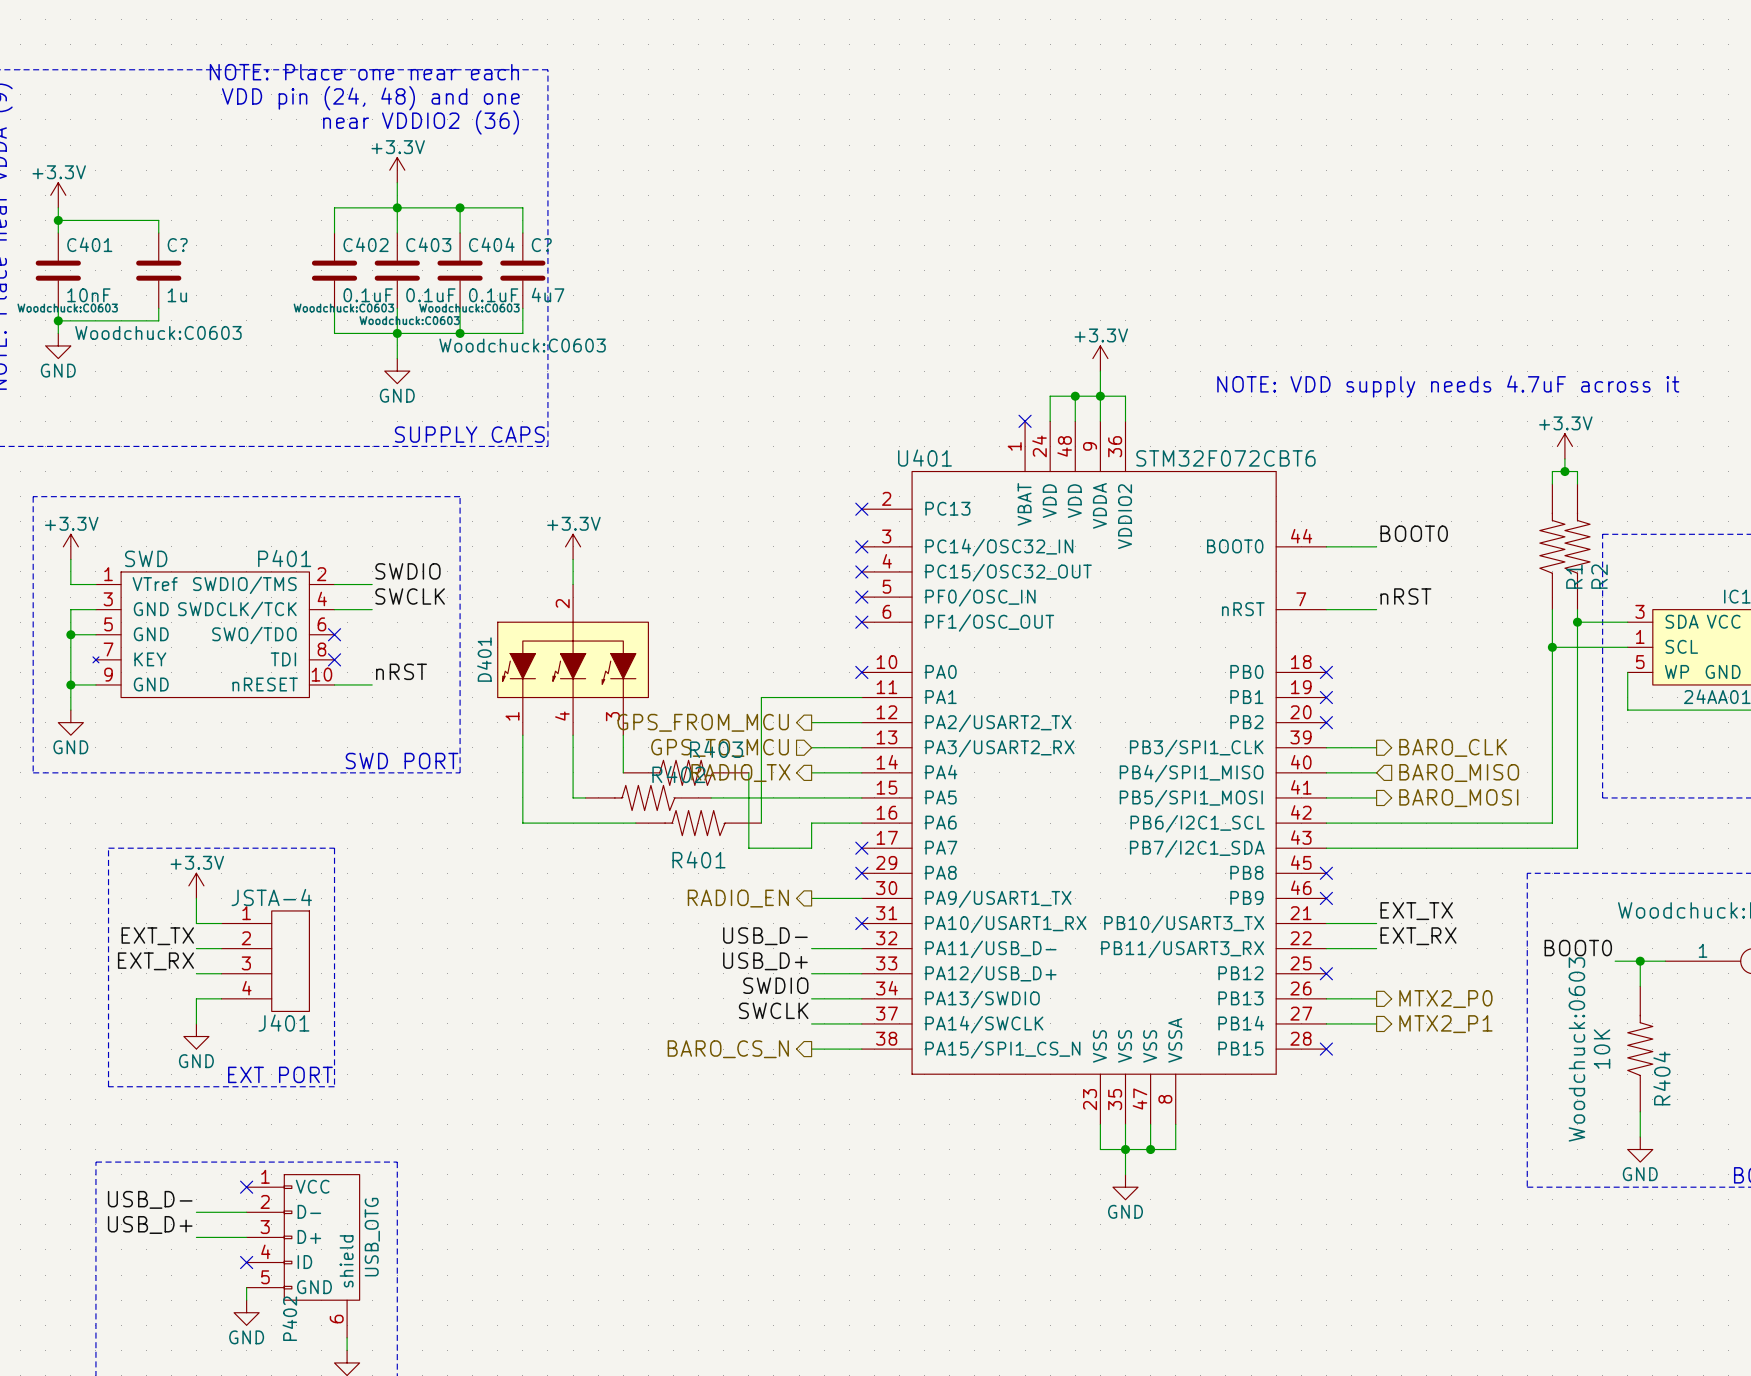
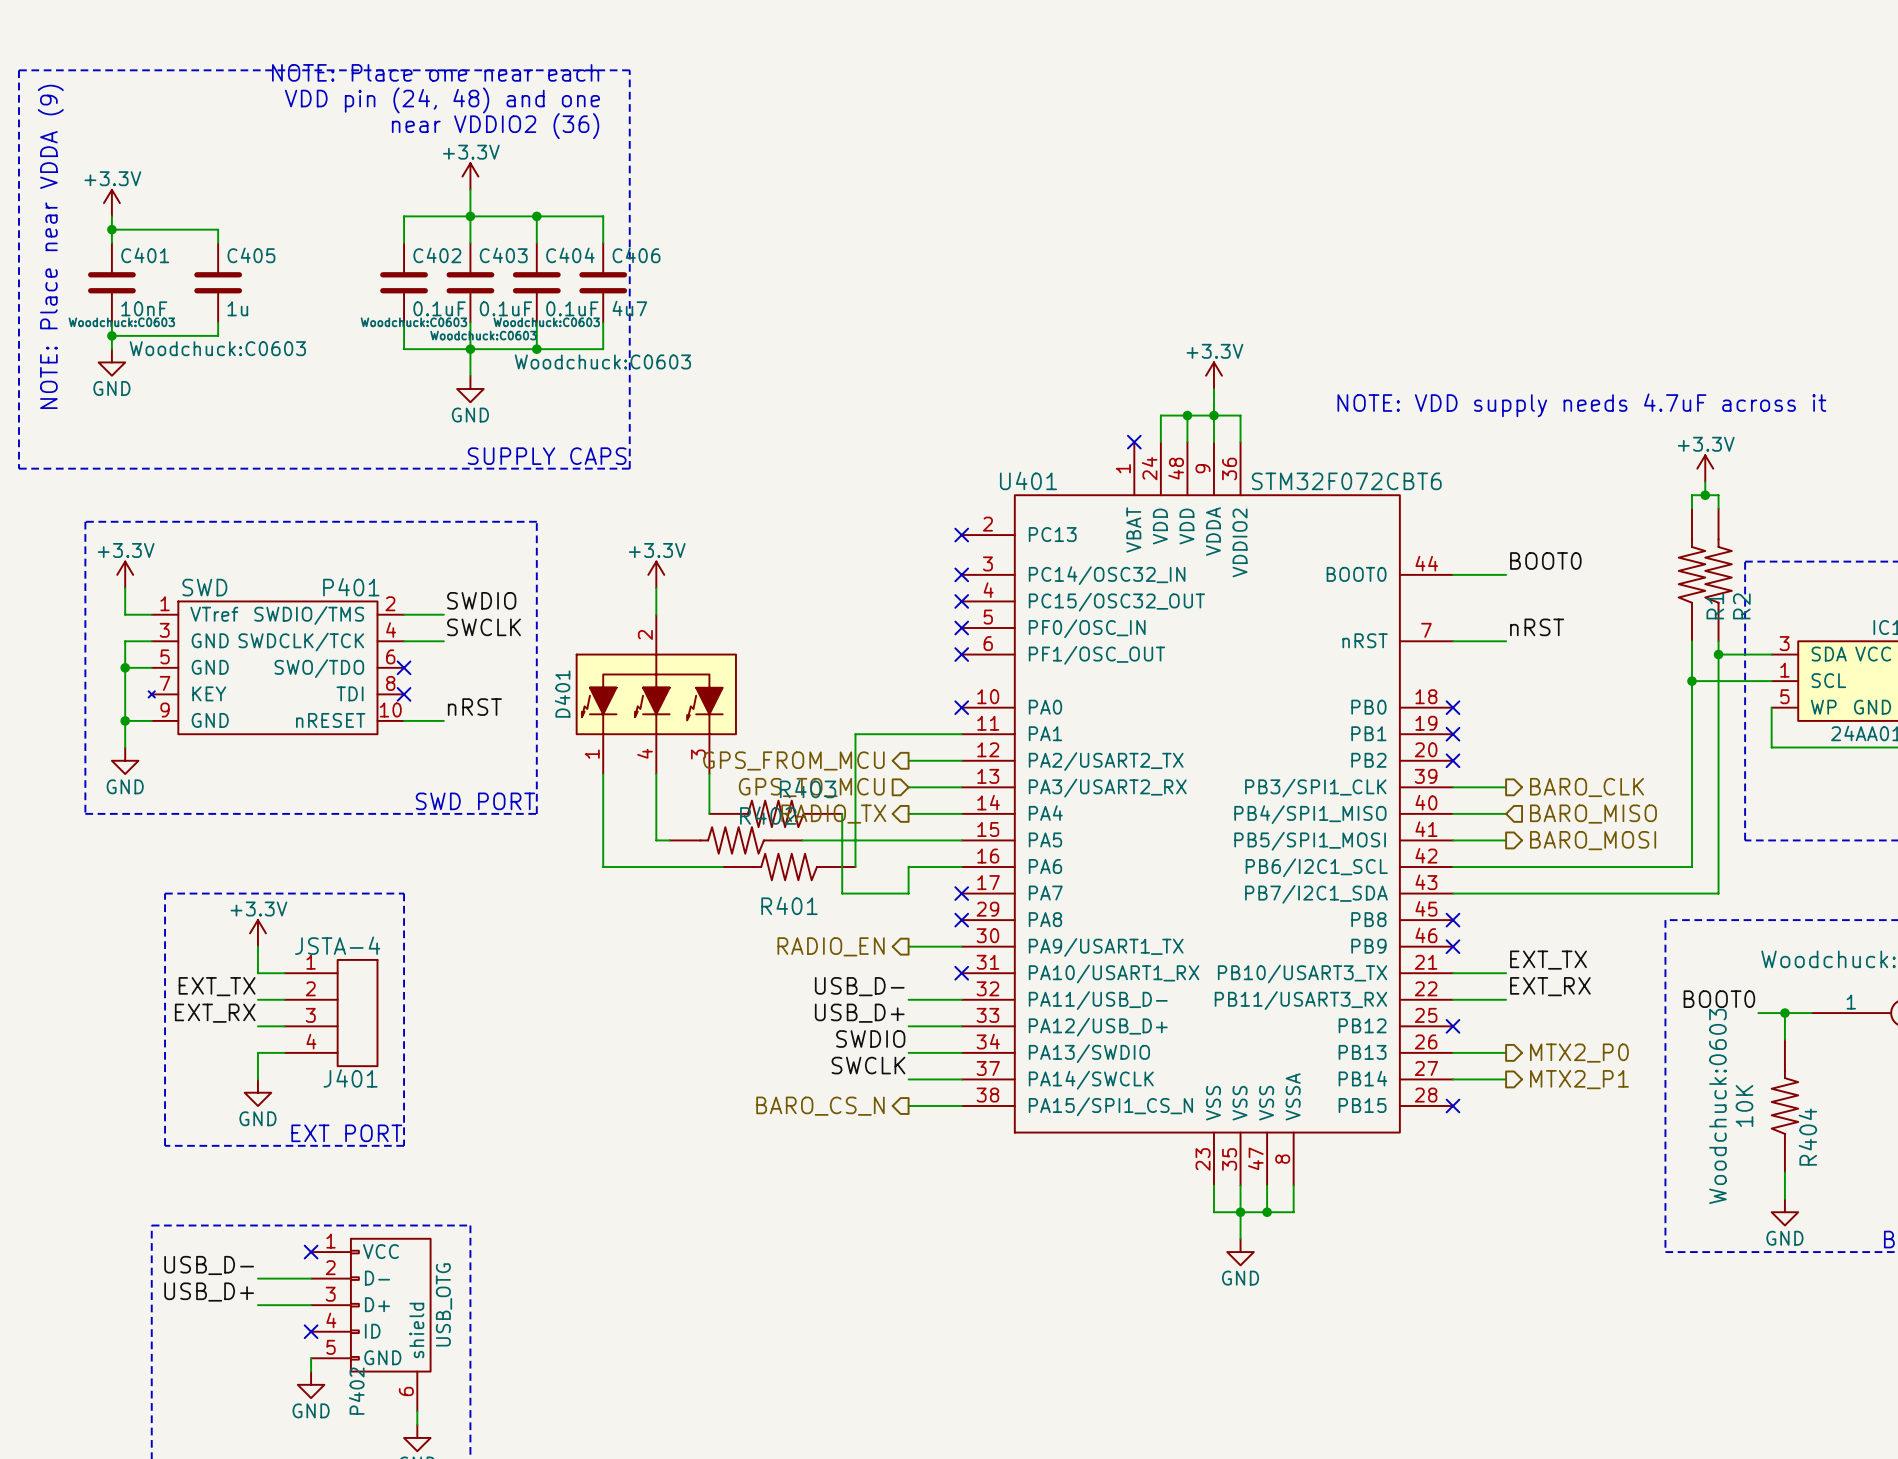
C? name: C? (177, 245) -> C405 (251, 255)
C? name: C? (541, 245) -> C406 (636, 255)

